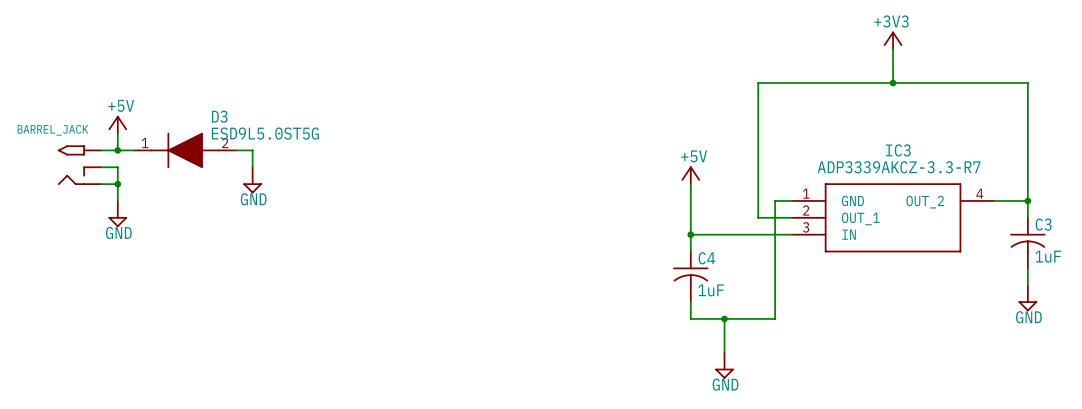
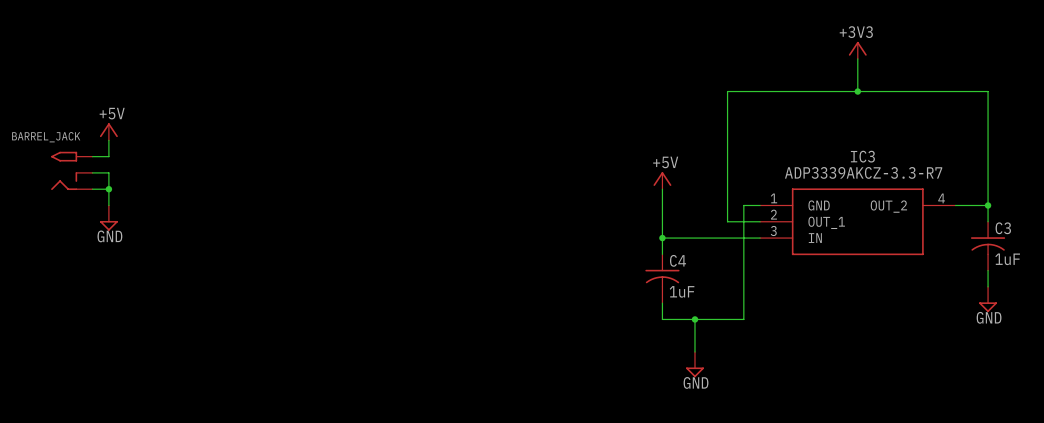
wire: (117, 150) (134, 150) -> none
junction: (117, 150) -> none
D3: ESD9L5.0ST5G (185, 150) -> none
wire: (235, 150) (252, 150) (252, 167) -> none
power symbol: GND (252, 180) -> none

